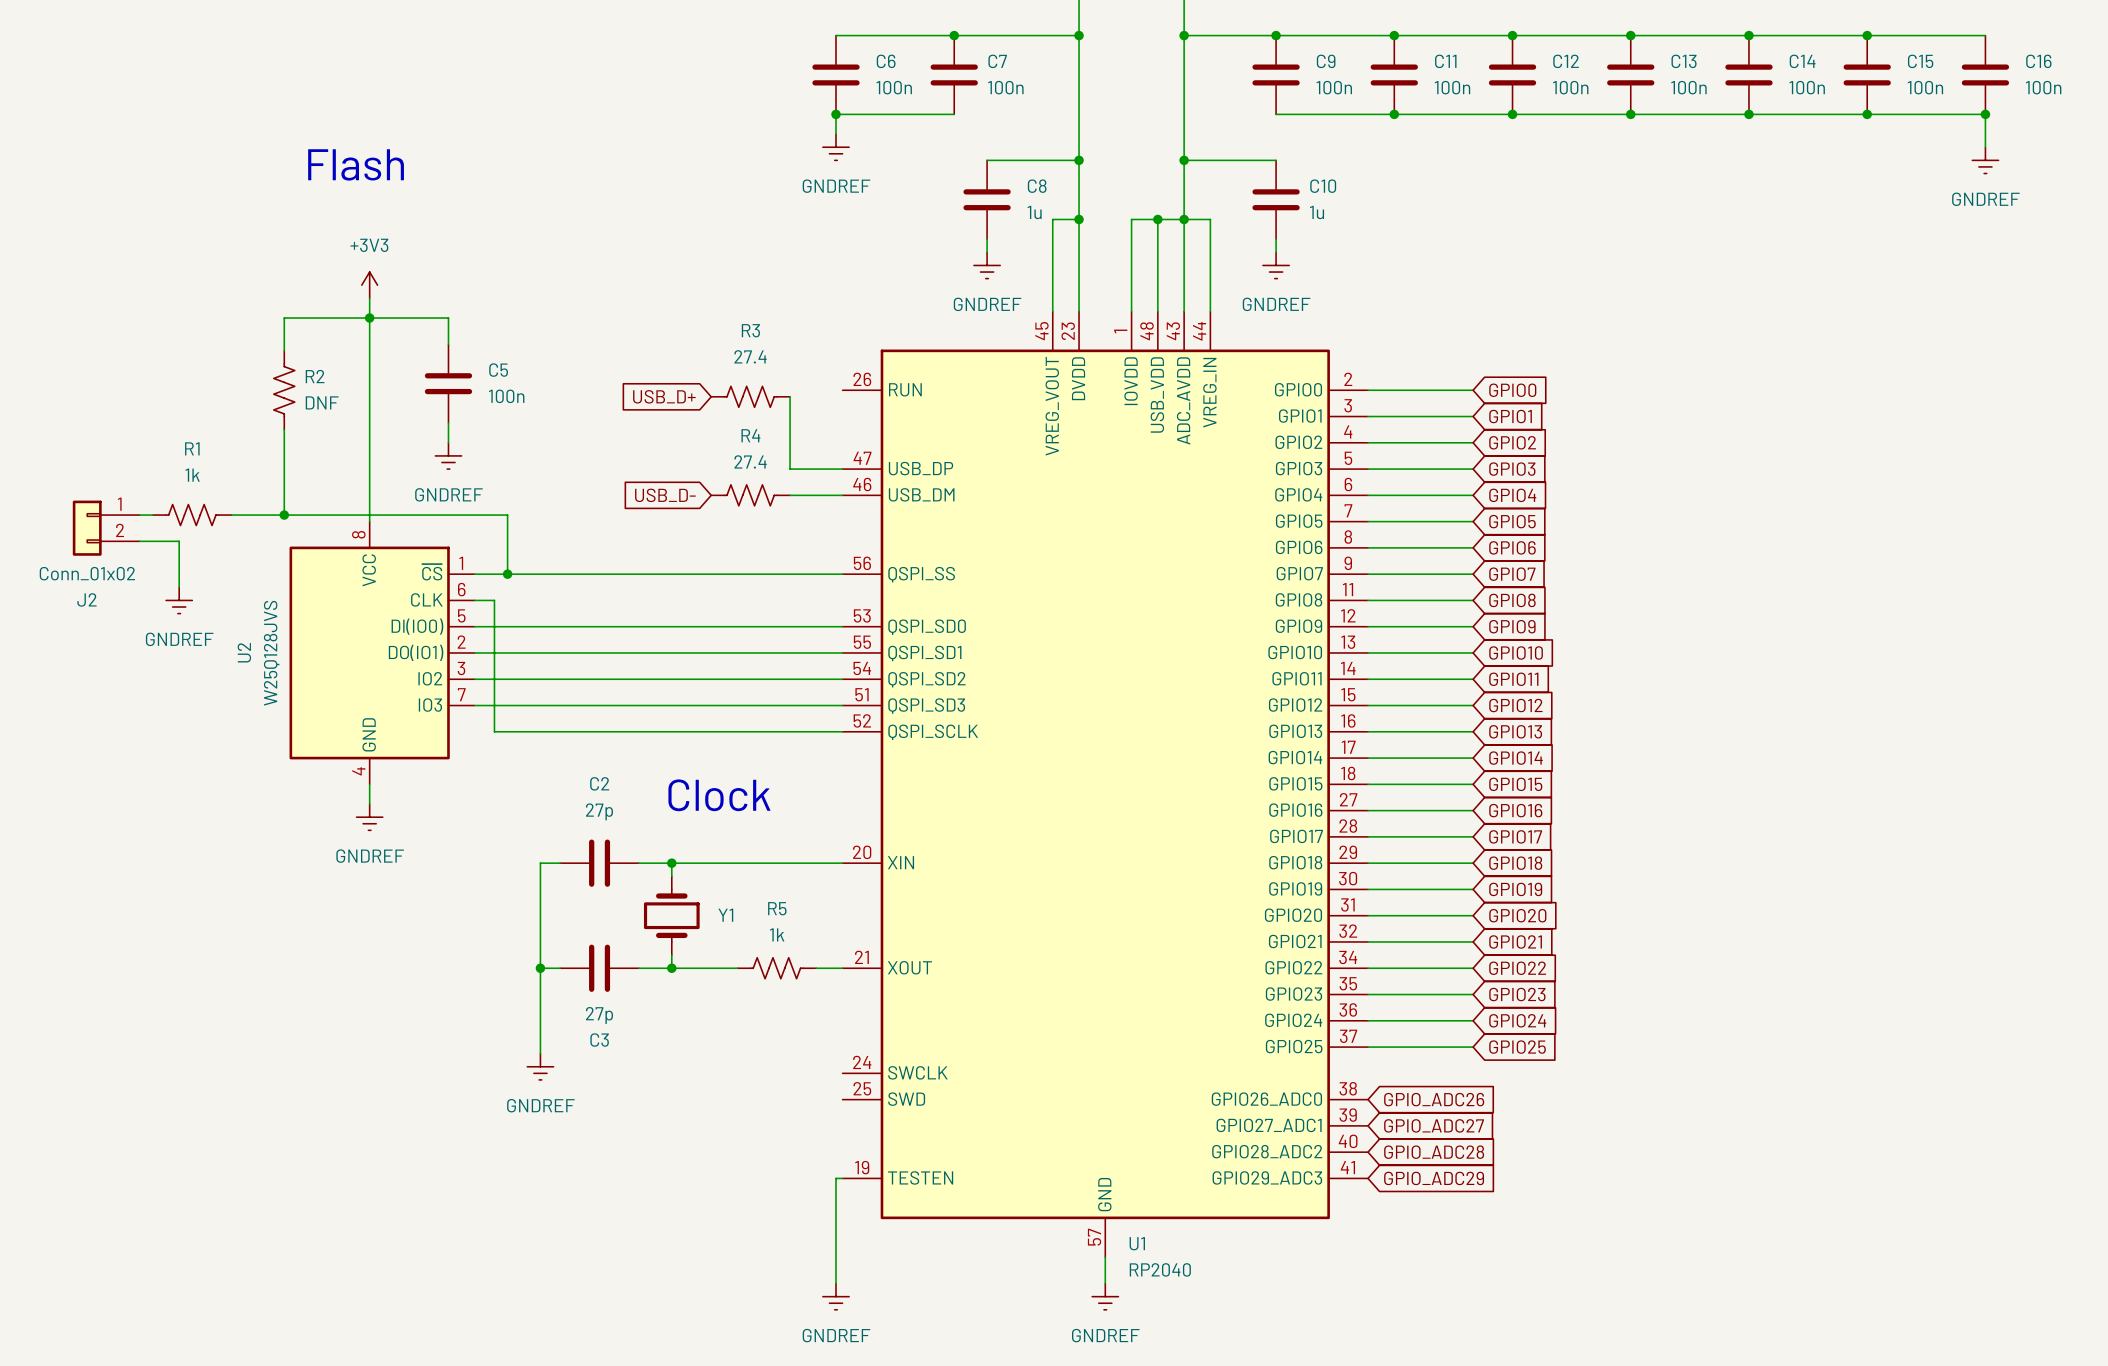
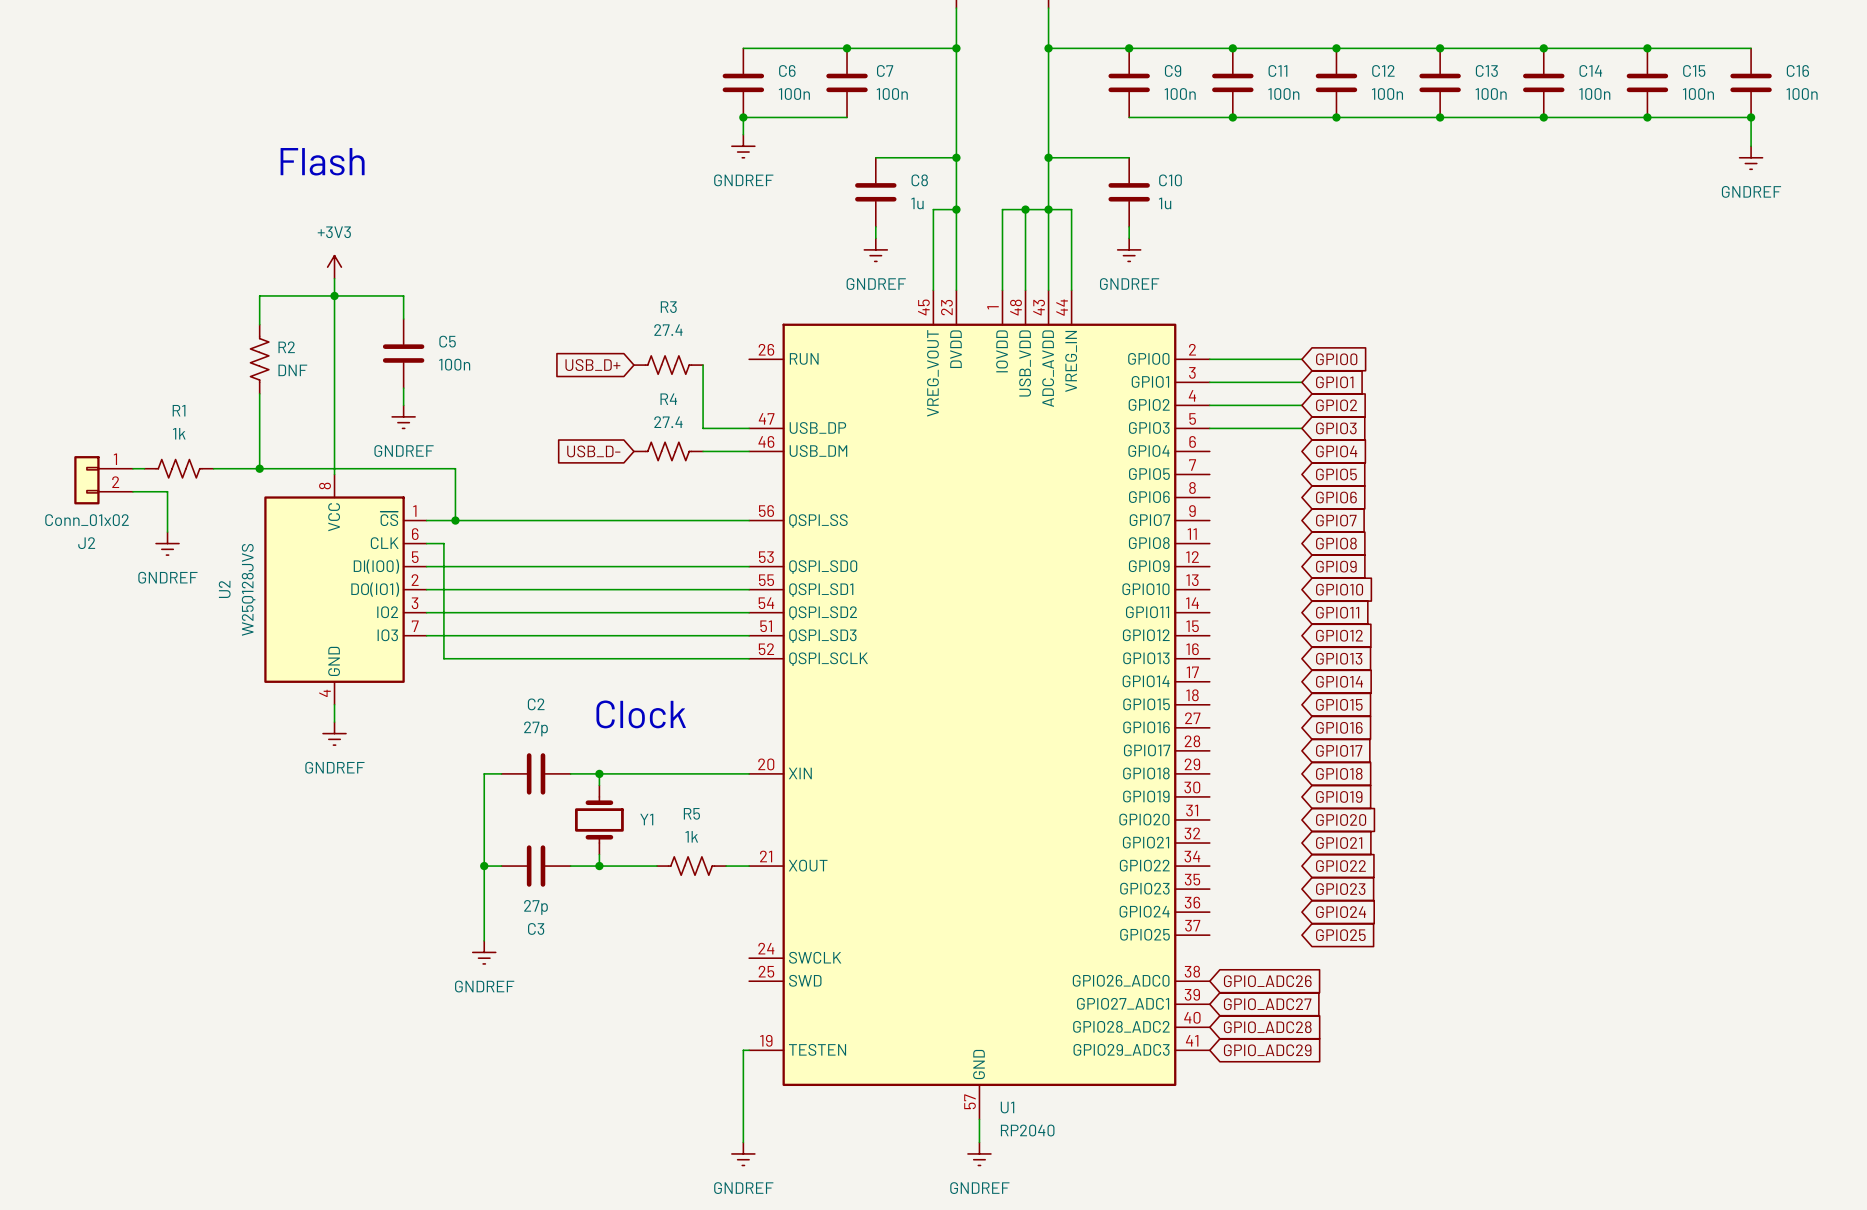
wire: (1368, 495) (1473, 495) -> none
wire: (1368, 521) (1473, 521) -> none
wire: (1368, 547) (1473, 547) -> none
wire: (1368, 574) (1473, 574) -> none
wire: (1368, 600) (1473, 600) -> none
wire: (1368, 626) (1473, 626) -> none
wire: (1368, 652) (1473, 652) -> none
wire: (1368, 679) (1473, 679) -> none
wire: (1368, 705) (1473, 705) -> none
wire: (1368, 731) (1473, 731) -> none
wire: (1368, 758) (1473, 758) -> none
wire: (1368, 784) (1473, 784) -> none
wire: (1368, 810) (1473, 810) -> none
wire: (1368, 836) (1473, 836) -> none
wire: (1368, 863) (1473, 863) -> none
wire: (1368, 889) (1473, 889) -> none
wire: (1368, 915) (1473, 915) -> none
wire: (1368, 941) (1473, 941) -> none
wire: (1368, 968) (1473, 968) -> none
wire: (1368, 994) (1473, 994) -> none
wire: (1368, 1020) (1473, 1020) -> none
wire: (1368, 1047) (1473, 1047) -> none

